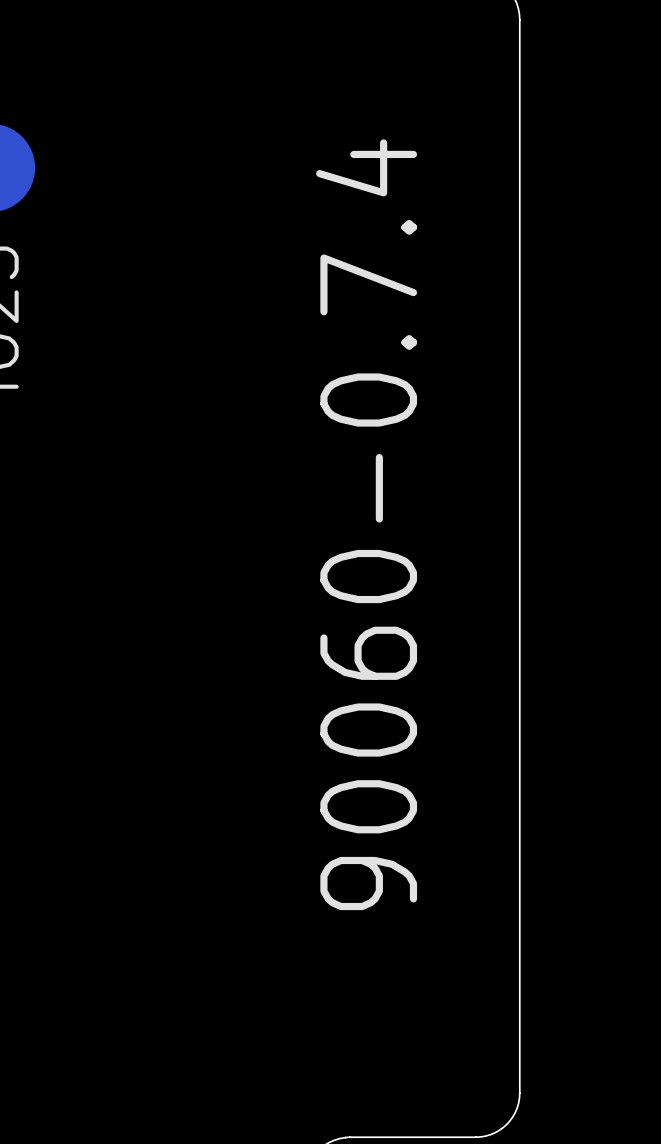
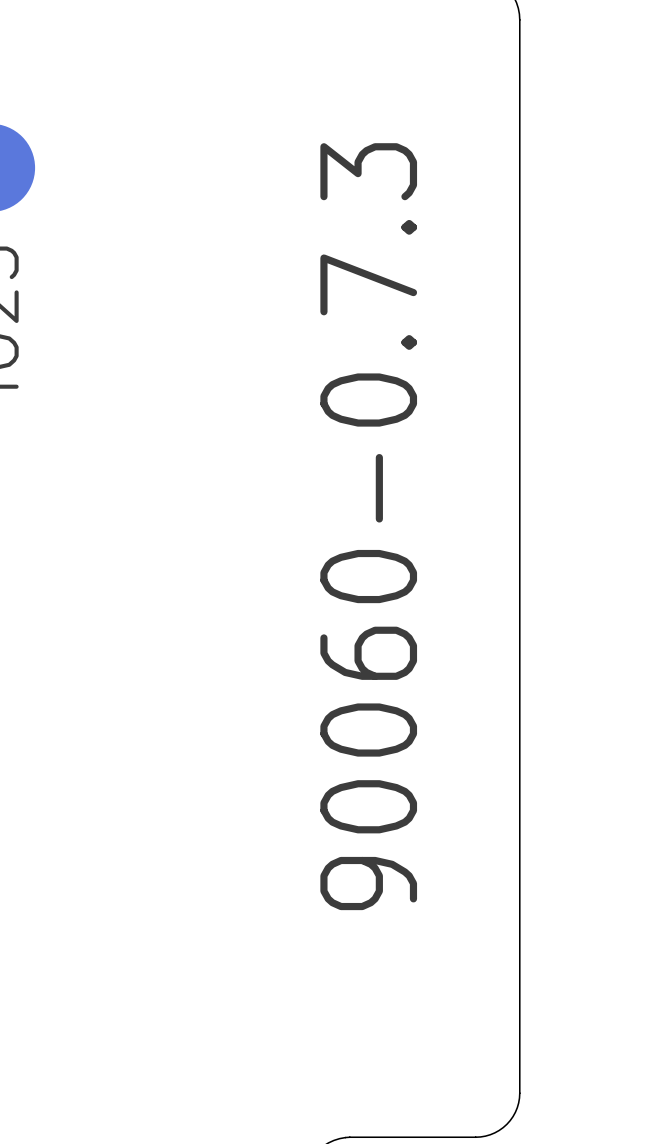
text: 90060-0.7.4 (366, 524) -> 90060-0.7.3 (368, 526)

